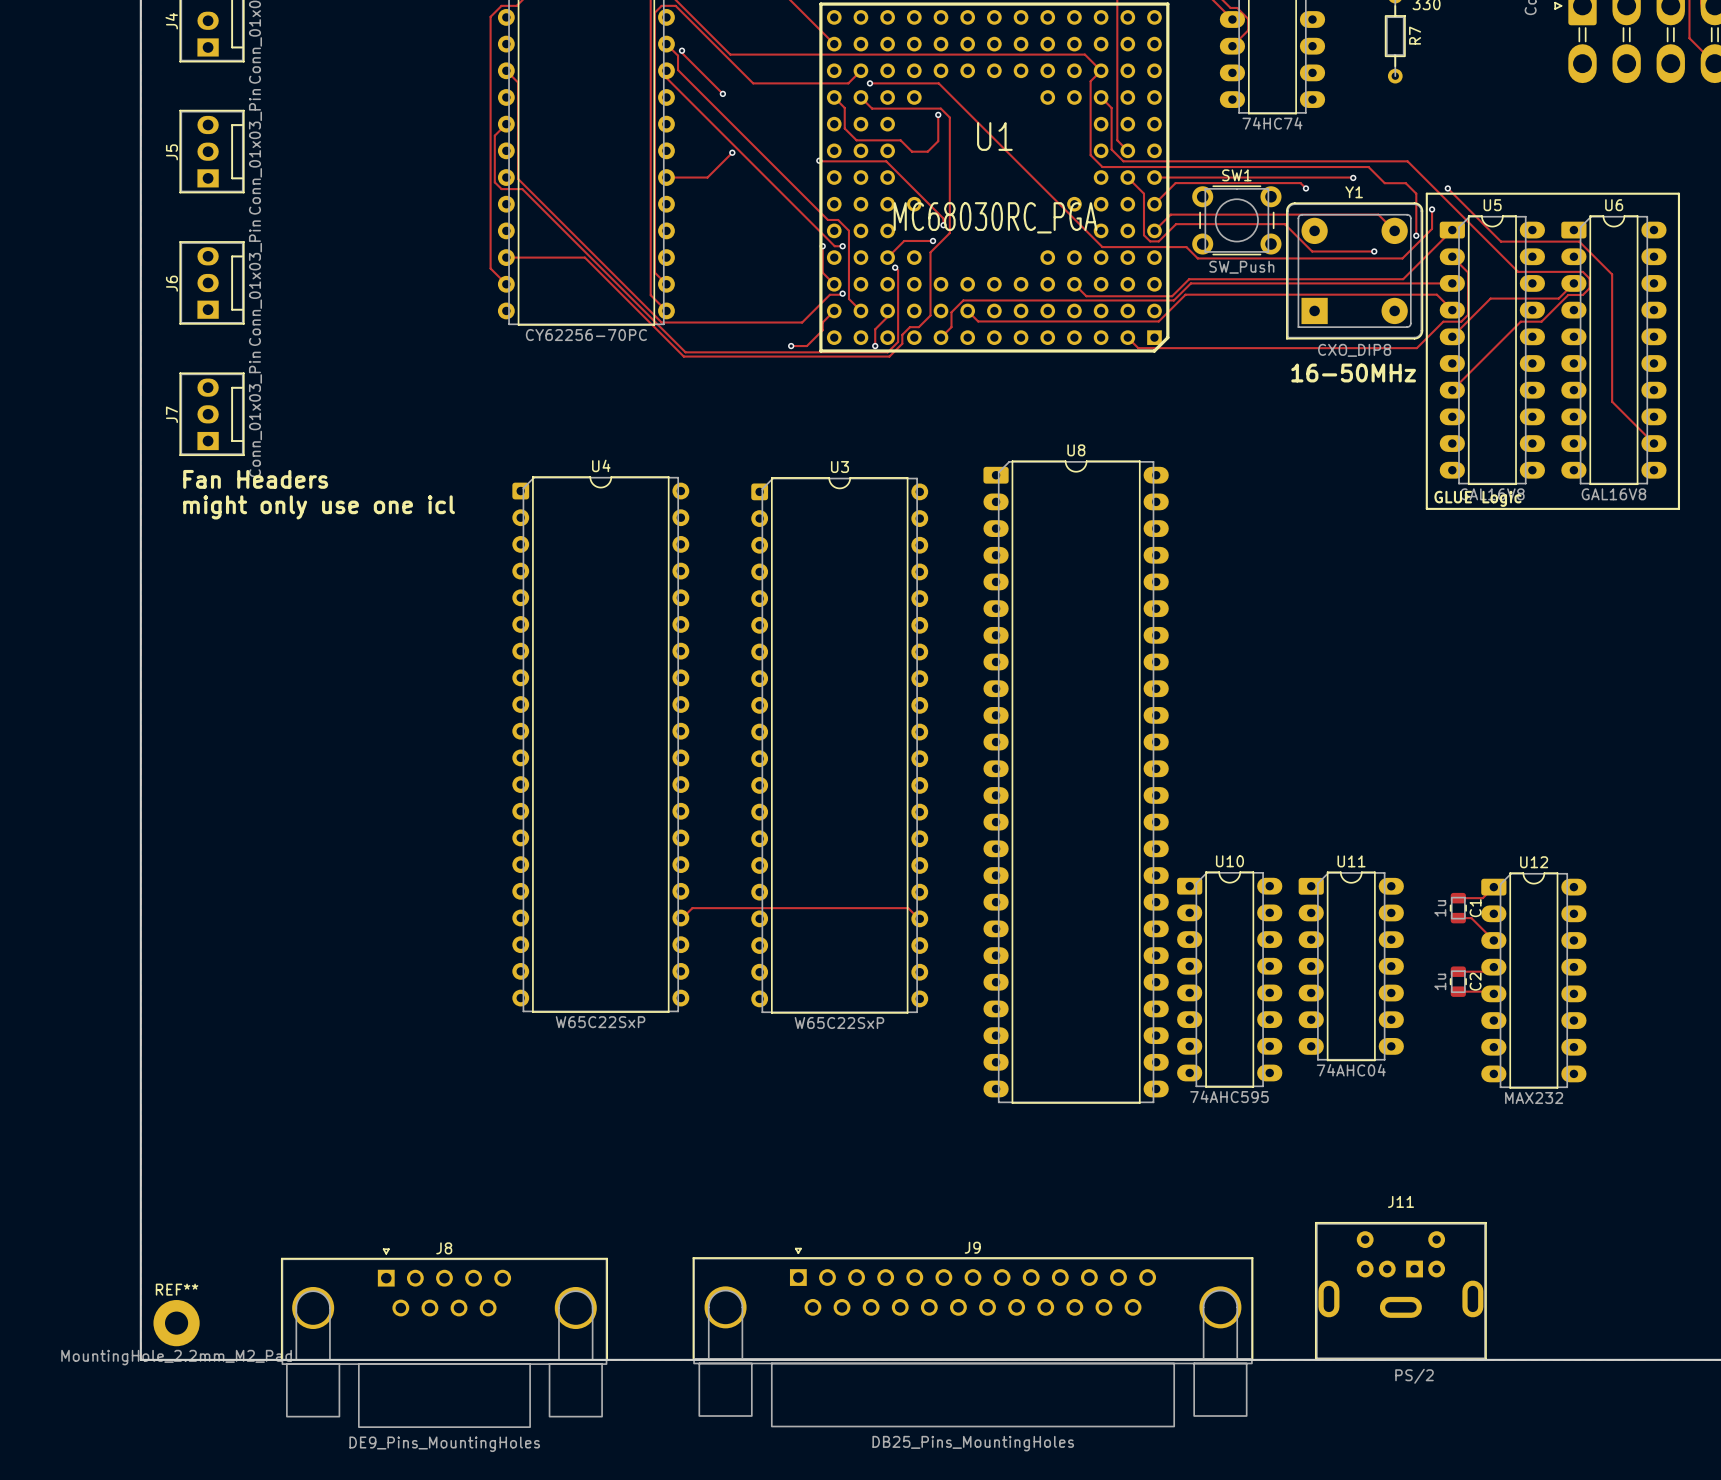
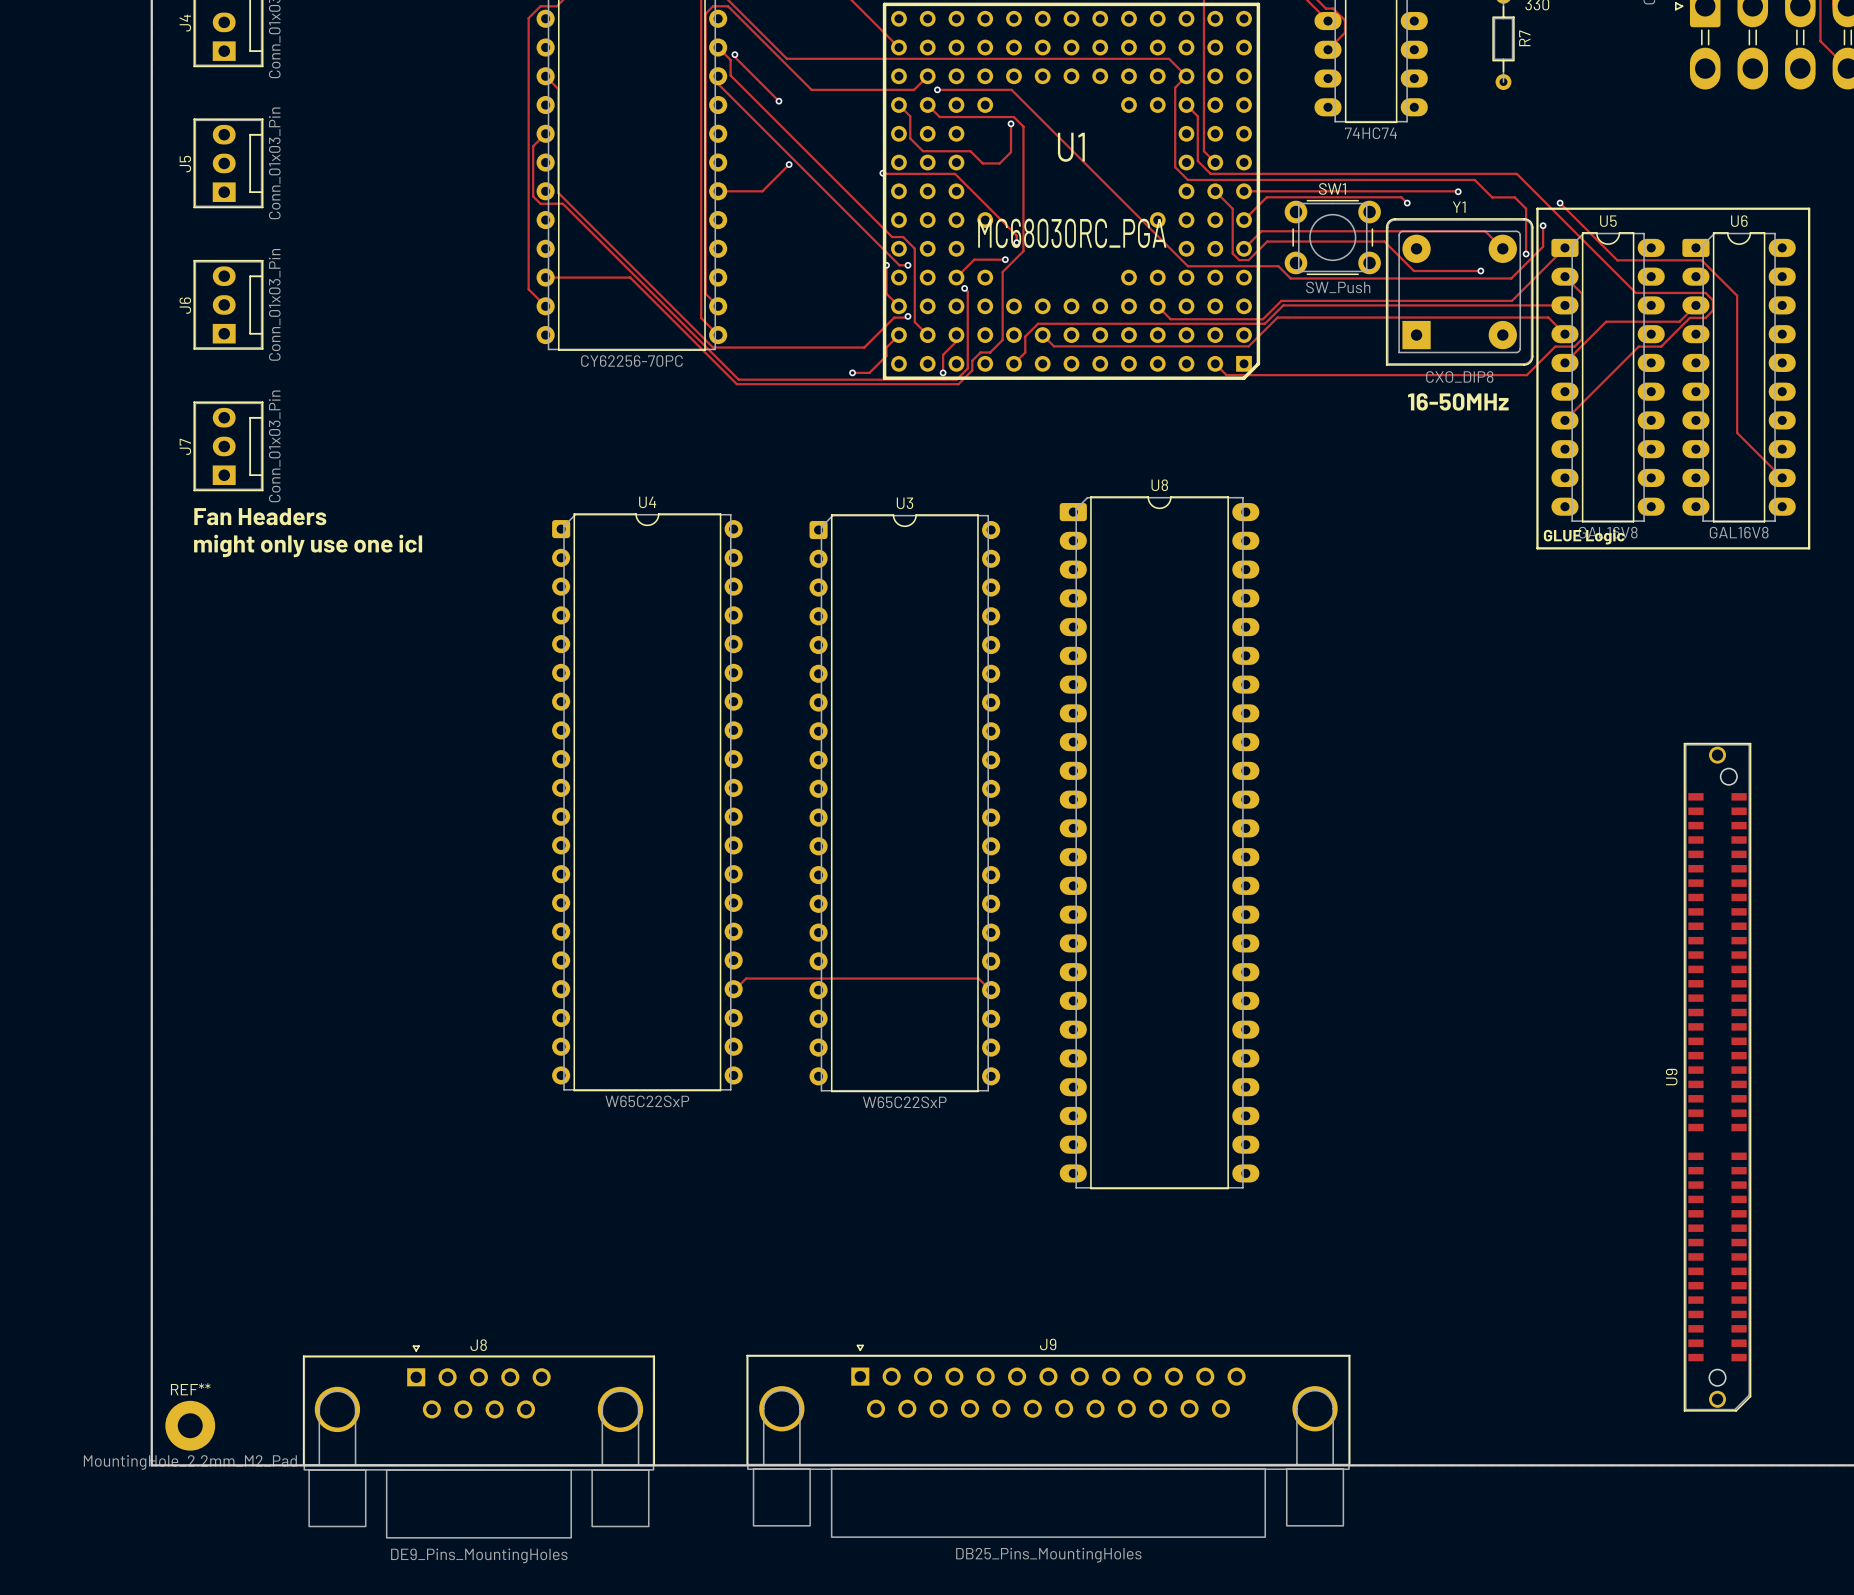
track: (1493, 887) (1482, 898) (1458, 898) -> none
C1: 1u (1458, 908) -> none
track: (1458, 918) (1471, 918) (1493, 940) -> none
U11: 74AHC04 (1351, 966) -> none
track: (1493, 967) (1489, 971) (1458, 971) -> none
U10: 74AHC595 (1229, 979) -> none
U12: MAX232 (1533, 980) -> none
C2: 1u (1458, 981) -> none
track: (1458, 991) (1491, 991) (1493, 993) -> none
U9: none -> (1717, 1077)
J11: PS/2 (1400, 1291) -> none

